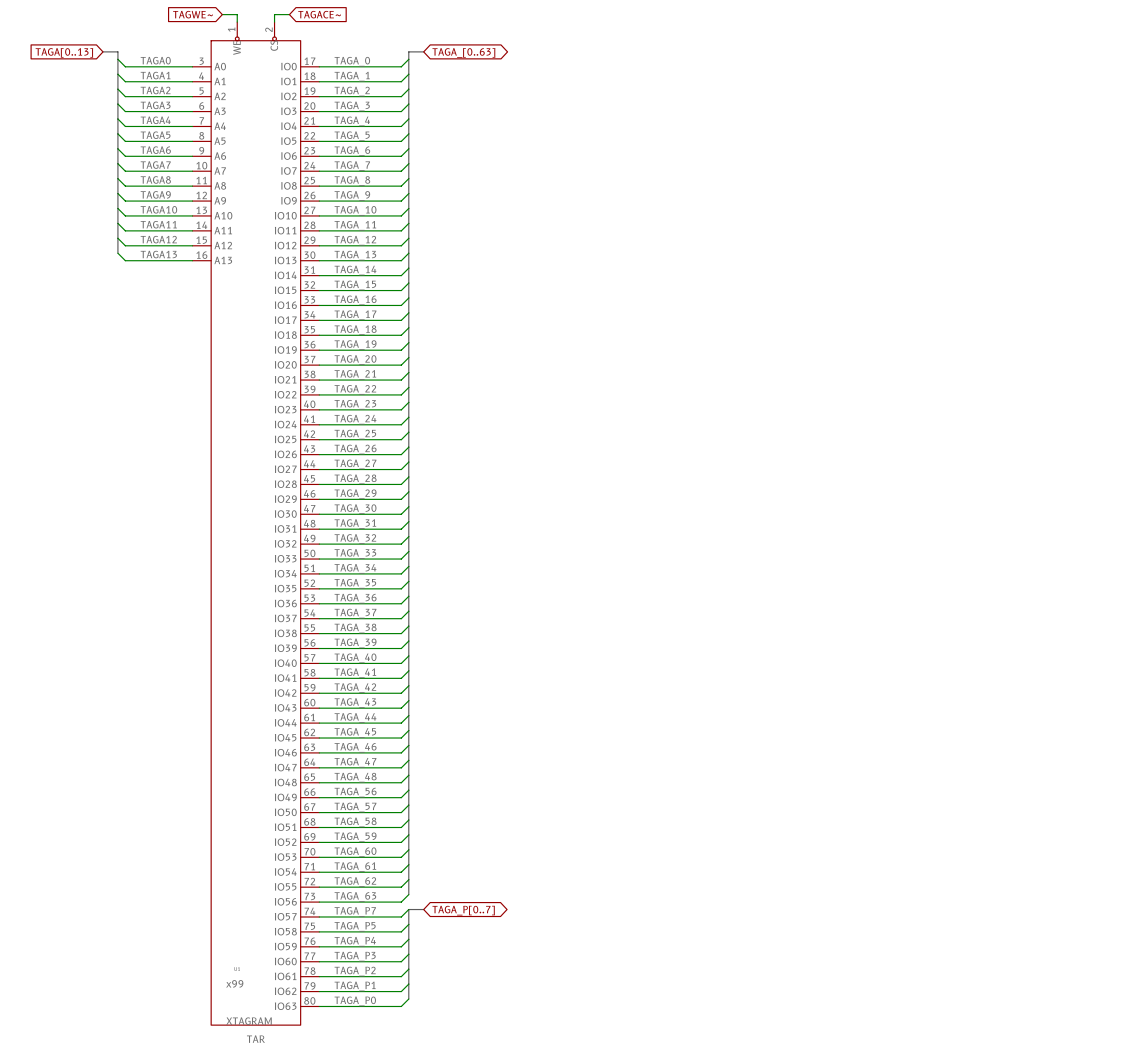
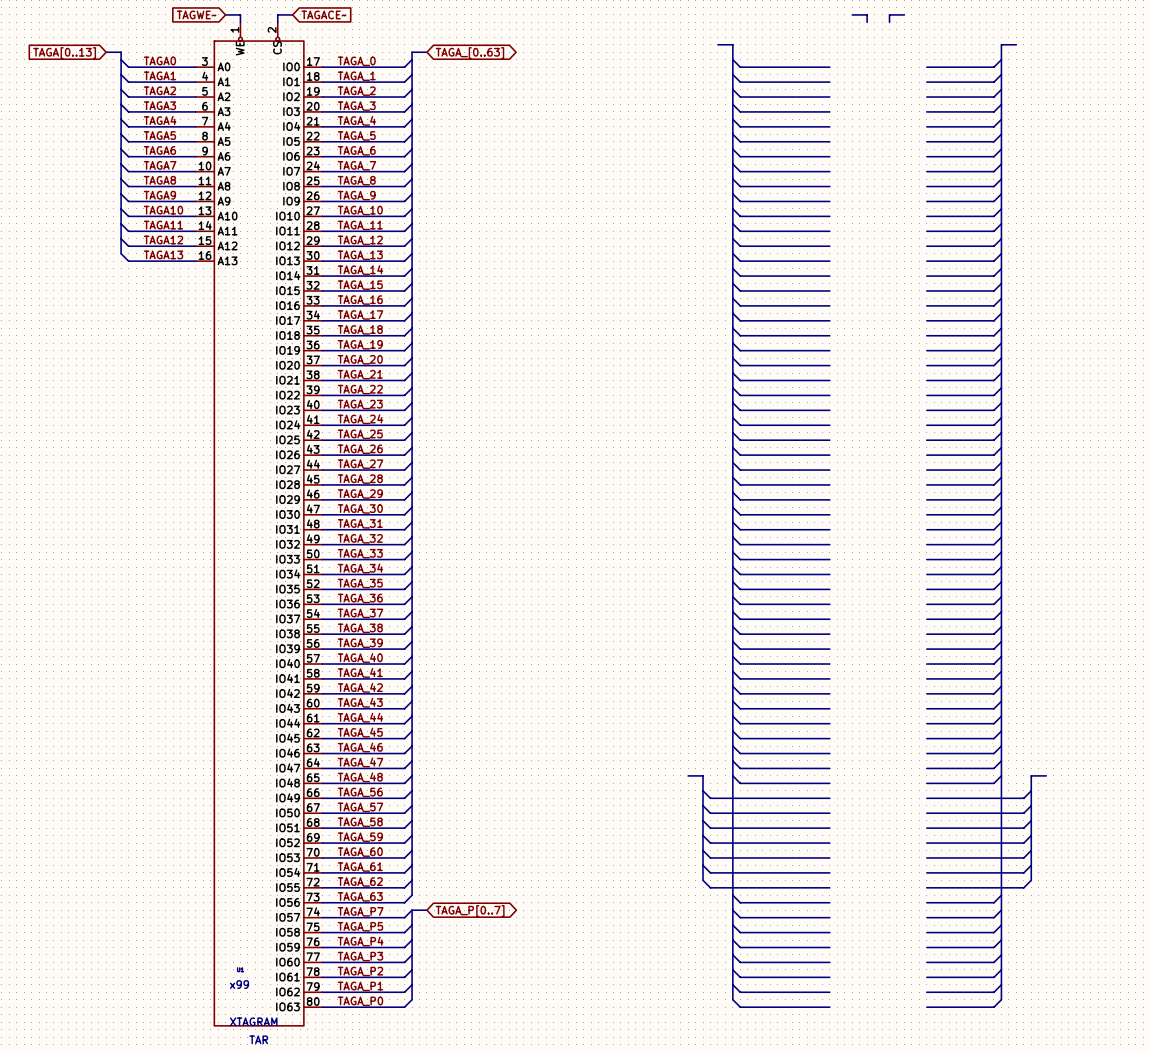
wire: none -> (852, 14) (867, 14) (867, 22)
wire: none -> (904, 14) (889, 14) (889, 22)
bus: none -> (717, 44) (732, 44) (732, 999)
bus: none -> (1016, 44) (1001, 44) (1001, 999)
wire: none -> (732, 59) (740, 67) (829, 67)
wire: none -> (1001, 59) (993, 67) (926, 67)
wire: none -> (732, 74) (740, 82) (829, 82)
wire: none -> (1001, 74) (993, 82) (926, 82)
wire: none -> (732, 89) (740, 97) (829, 97)
wire: none -> (1001, 89) (993, 97) (926, 97)
wire: none -> (732, 104) (740, 111) (829, 111)
wire: none -> (1001, 104) (993, 111) (926, 111)
wire: none -> (732, 119) (740, 126) (829, 126)
wire: none -> (1001, 119) (993, 126) (926, 126)
wire: none -> (732, 134) (740, 141) (829, 141)
wire: none -> (1001, 134) (993, 141) (926, 141)
wire: none -> (732, 149) (740, 156) (829, 156)
wire: none -> (1001, 149) (993, 156) (926, 156)
wire: none -> (732, 164) (740, 171) (829, 171)
wire: none -> (1001, 164) (993, 171) (926, 171)
wire: none -> (732, 179) (740, 186) (829, 186)
wire: none -> (1001, 179) (993, 186) (926, 186)
wire: none -> (732, 193) (740, 201) (829, 201)
wire: none -> (1001, 193) (993, 201) (926, 201)
wire: none -> (732, 208) (740, 216) (829, 216)
wire: none -> (1001, 208) (993, 216) (926, 216)
wire: none -> (732, 223) (740, 231) (829, 231)
wire: none -> (1001, 223) (993, 231) (926, 231)
wire: none -> (732, 238) (740, 246) (829, 246)
wire: none -> (1001, 238) (993, 246) (926, 246)
wire: none -> (732, 253) (740, 261) (829, 261)
wire: none -> (1001, 253) (993, 261) (926, 261)
wire: none -> (732, 268) (740, 276) (829, 276)
wire: none -> (1001, 268) (993, 276) (926, 276)
wire: none -> (732, 283) (740, 290) (829, 290)
wire: none -> (1001, 283) (993, 290) (926, 290)
wire: none -> (732, 298) (740, 305) (829, 305)
wire: none -> (1001, 298) (993, 305) (926, 305)
wire: none -> (732, 313) (740, 320) (829, 320)
wire: none -> (1001, 313) (993, 320) (926, 320)
wire: none -> (732, 328) (740, 335) (829, 335)
wire: none -> (1001, 328) (993, 335) (926, 335)
wire: none -> (732, 343) (740, 350) (829, 350)
wire: none -> (1001, 343) (993, 350) (926, 350)
wire: none -> (732, 358) (740, 365) (829, 365)
wire: none -> (1001, 358) (993, 365) (926, 365)
wire: none -> (732, 373) (740, 380) (829, 380)
wire: none -> (1001, 373) (993, 380) (926, 380)
wire: none -> (732, 387) (740, 395) (829, 395)
wire: none -> (1001, 387) (993, 395) (926, 395)
wire: none -> (732, 402) (740, 410) (829, 410)
wire: none -> (1001, 402) (993, 410) (926, 410)
wire: none -> (732, 417) (740, 425) (829, 425)
wire: none -> (1001, 417) (993, 425) (926, 425)
wire: none -> (732, 432) (740, 440) (829, 440)
wire: none -> (1001, 432) (993, 440) (926, 440)
wire: none -> (732, 447) (740, 455) (829, 455)
wire: none -> (1001, 447) (993, 455) (926, 455)
wire: none -> (732, 462) (740, 470) (829, 470)
wire: none -> (1001, 462) (993, 470) (926, 470)
wire: none -> (732, 477) (740, 484) (829, 484)
wire: none -> (1001, 477) (993, 484) (926, 484)
wire: none -> (732, 492) (740, 499) (829, 499)
wire: none -> (1001, 492) (993, 499) (926, 499)
wire: none -> (732, 507) (740, 514) (829, 514)
wire: none -> (1001, 507) (993, 514) (926, 514)
wire: none -> (732, 522) (740, 529) (829, 529)
wire: none -> (1001, 522) (993, 529) (926, 529)
wire: none -> (732, 537) (740, 544) (829, 544)
wire: none -> (1001, 537) (993, 544) (926, 544)
wire: none -> (732, 552) (740, 559) (829, 559)
wire: none -> (1001, 552) (993, 559) (926, 559)
wire: none -> (732, 567) (740, 574) (829, 574)
wire: none -> (1001, 567) (993, 574) (926, 574)
wire: none -> (732, 581) (740, 589) (829, 589)
wire: none -> (1001, 581) (993, 589) (926, 589)
wire: none -> (732, 596) (740, 604) (829, 604)
wire: none -> (1001, 596) (993, 604) (926, 604)
wire: none -> (732, 611) (740, 619) (829, 619)
wire: none -> (1001, 611) (993, 619) (926, 619)
wire: none -> (732, 626) (740, 634) (829, 634)
wire: none -> (1001, 626) (993, 634) (926, 634)
wire: none -> (732, 641) (740, 649) (829, 649)
wire: none -> (1001, 641) (993, 649) (926, 649)
wire: none -> (732, 656) (740, 664) (829, 664)
wire: none -> (1001, 656) (993, 664) (926, 664)
wire: none -> (732, 671) (740, 678) (829, 678)
wire: none -> (1001, 671) (993, 678) (926, 678)
wire: none -> (732, 686) (740, 693) (829, 693)
wire: none -> (1001, 686) (993, 693) (926, 693)
wire: none -> (732, 701) (740, 708) (829, 708)
wire: none -> (1001, 701) (993, 708) (926, 708)
wire: none -> (732, 716) (740, 723) (829, 723)
wire: none -> (1001, 716) (993, 723) (926, 723)
wire: none -> (732, 731) (740, 738) (829, 738)
wire: none -> (1001, 731) (993, 738) (926, 738)
wire: none -> (732, 746) (740, 753) (829, 753)
wire: none -> (1001, 746) (993, 753) (926, 753)
wire: none -> (732, 760) (740, 768) (829, 768)
wire: none -> (1001, 760) (993, 768) (926, 768)
bus: none -> (688, 775) (703, 775) (703, 880)
wire: none -> (732, 775) (740, 783) (829, 783)
wire: none -> (1001, 775) (993, 783) (926, 783)
bus: none -> (1046, 775) (1031, 775) (1031, 880)
wire: none -> (703, 790) (710, 798) (829, 798)
wire: none -> (1031, 790) (1023, 798) (926, 798)
wire: none -> (703, 805) (710, 813) (829, 813)
wire: none -> (1031, 805) (1023, 813) (926, 813)
wire: none -> (703, 820) (710, 828) (829, 828)
wire: none -> (1031, 820) (1023, 828) (926, 828)
wire: none -> (703, 835) (710, 843) (829, 843)
wire: none -> (1031, 835) (1023, 843) (926, 843)
wire: none -> (703, 850) (710, 857) (829, 857)
wire: none -> (1031, 850) (1023, 857) (926, 857)
wire: none -> (703, 865) (710, 872) (829, 872)
wire: none -> (1031, 865) (1023, 872) (926, 872)
wire: none -> (703, 880) (710, 887) (829, 887)
wire: none -> (1031, 880) (1023, 887) (926, 887)
wire: none -> (732, 895) (740, 902) (829, 902)
wire: none -> (1001, 895) (993, 902) (926, 902)
wire: none -> (732, 910) (740, 917) (829, 917)
wire: none -> (1001, 910) (993, 917) (926, 917)
wire: none -> (732, 925) (740, 932) (829, 932)
wire: none -> (1001, 925) (993, 932) (926, 932)
wire: none -> (732, 940) (740, 947) (829, 947)
wire: none -> (1001, 940) (993, 947) (926, 947)
wire: none -> (732, 954) (740, 962) (829, 962)
wire: none -> (1001, 954) (993, 962) (926, 962)
wire: none -> (732, 969) (740, 977) (829, 977)
wire: none -> (1001, 969) (993, 977) (926, 977)
wire: none -> (732, 984) (740, 992) (829, 992)
wire: none -> (1001, 984) (993, 992) (926, 992)
wire: none -> (732, 999) (740, 1007) (829, 1007)
wire: none -> (1001, 999) (993, 1007) (926, 1007)

